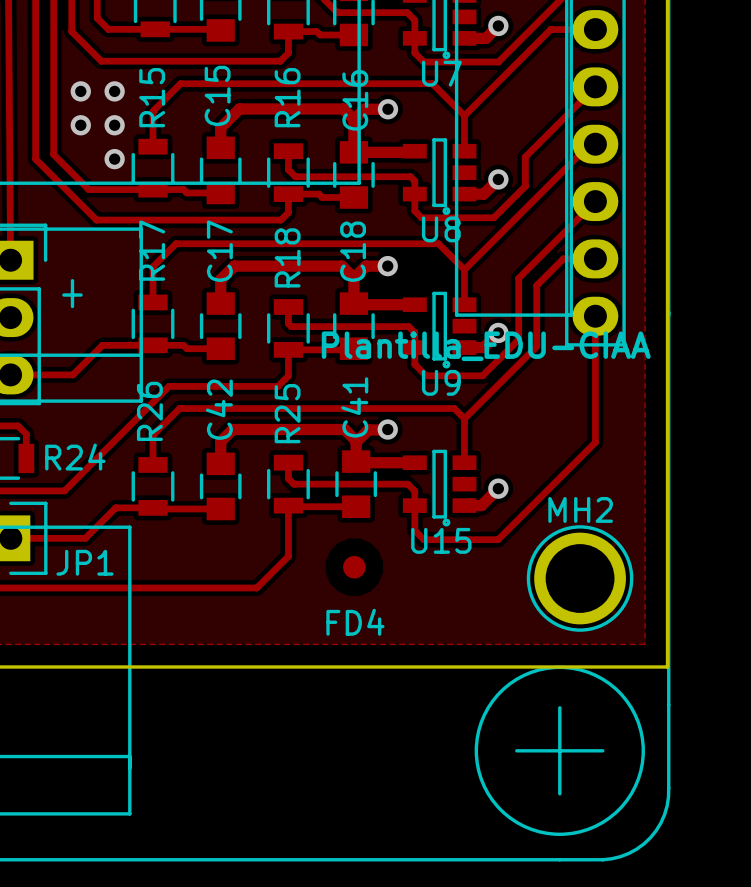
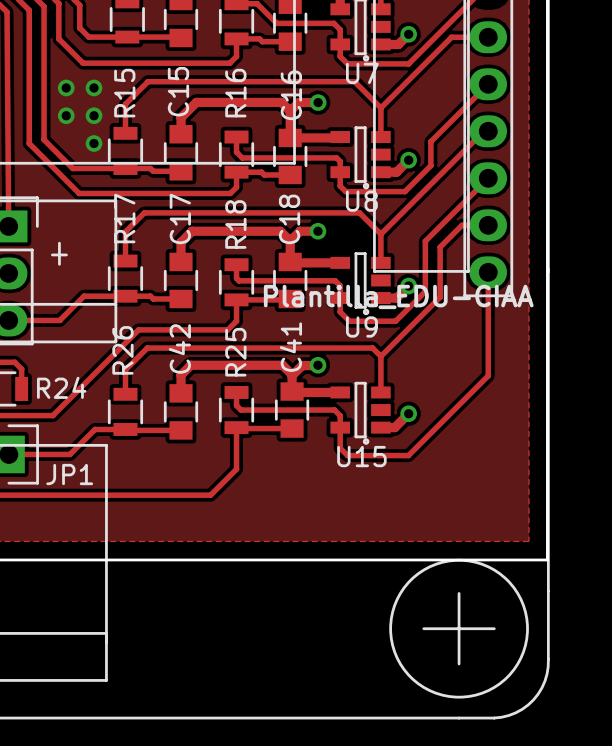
FD4: (354, 567) -> none
MH2: (580, 578) -> none

